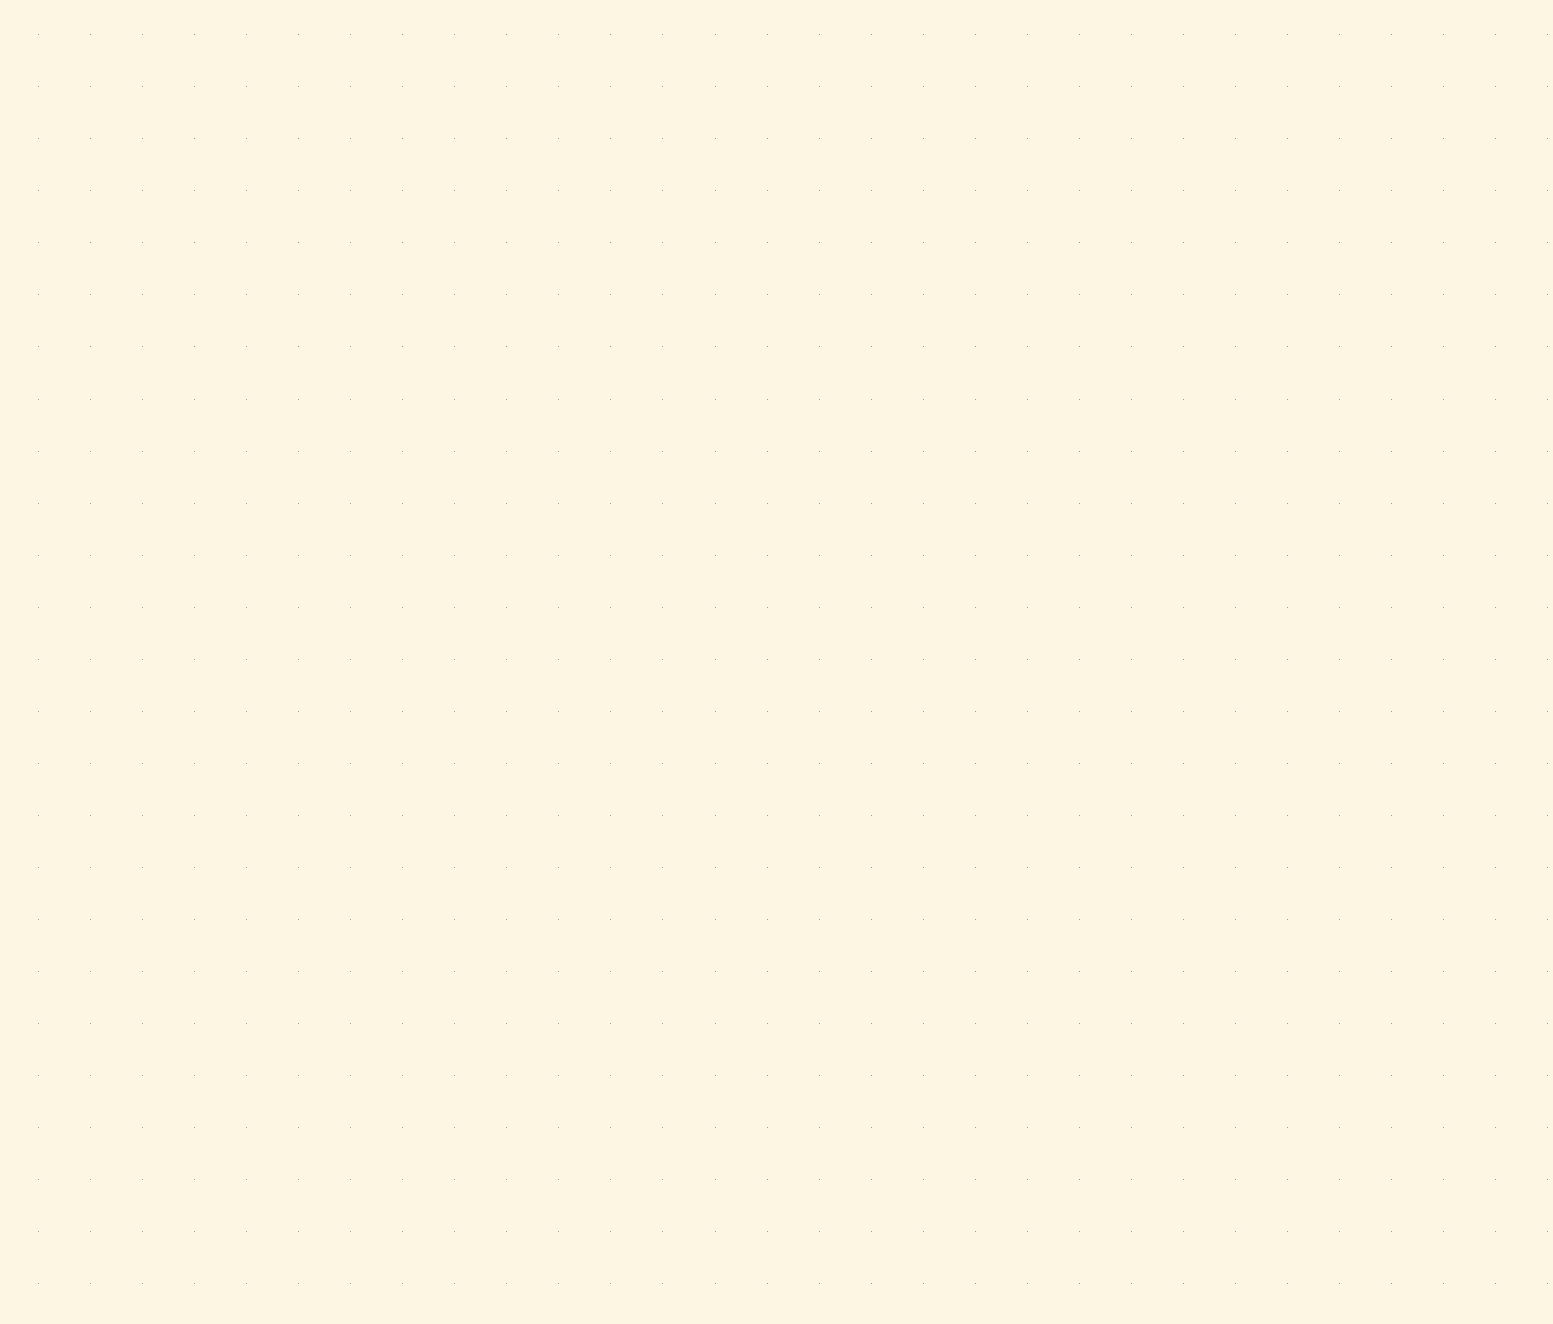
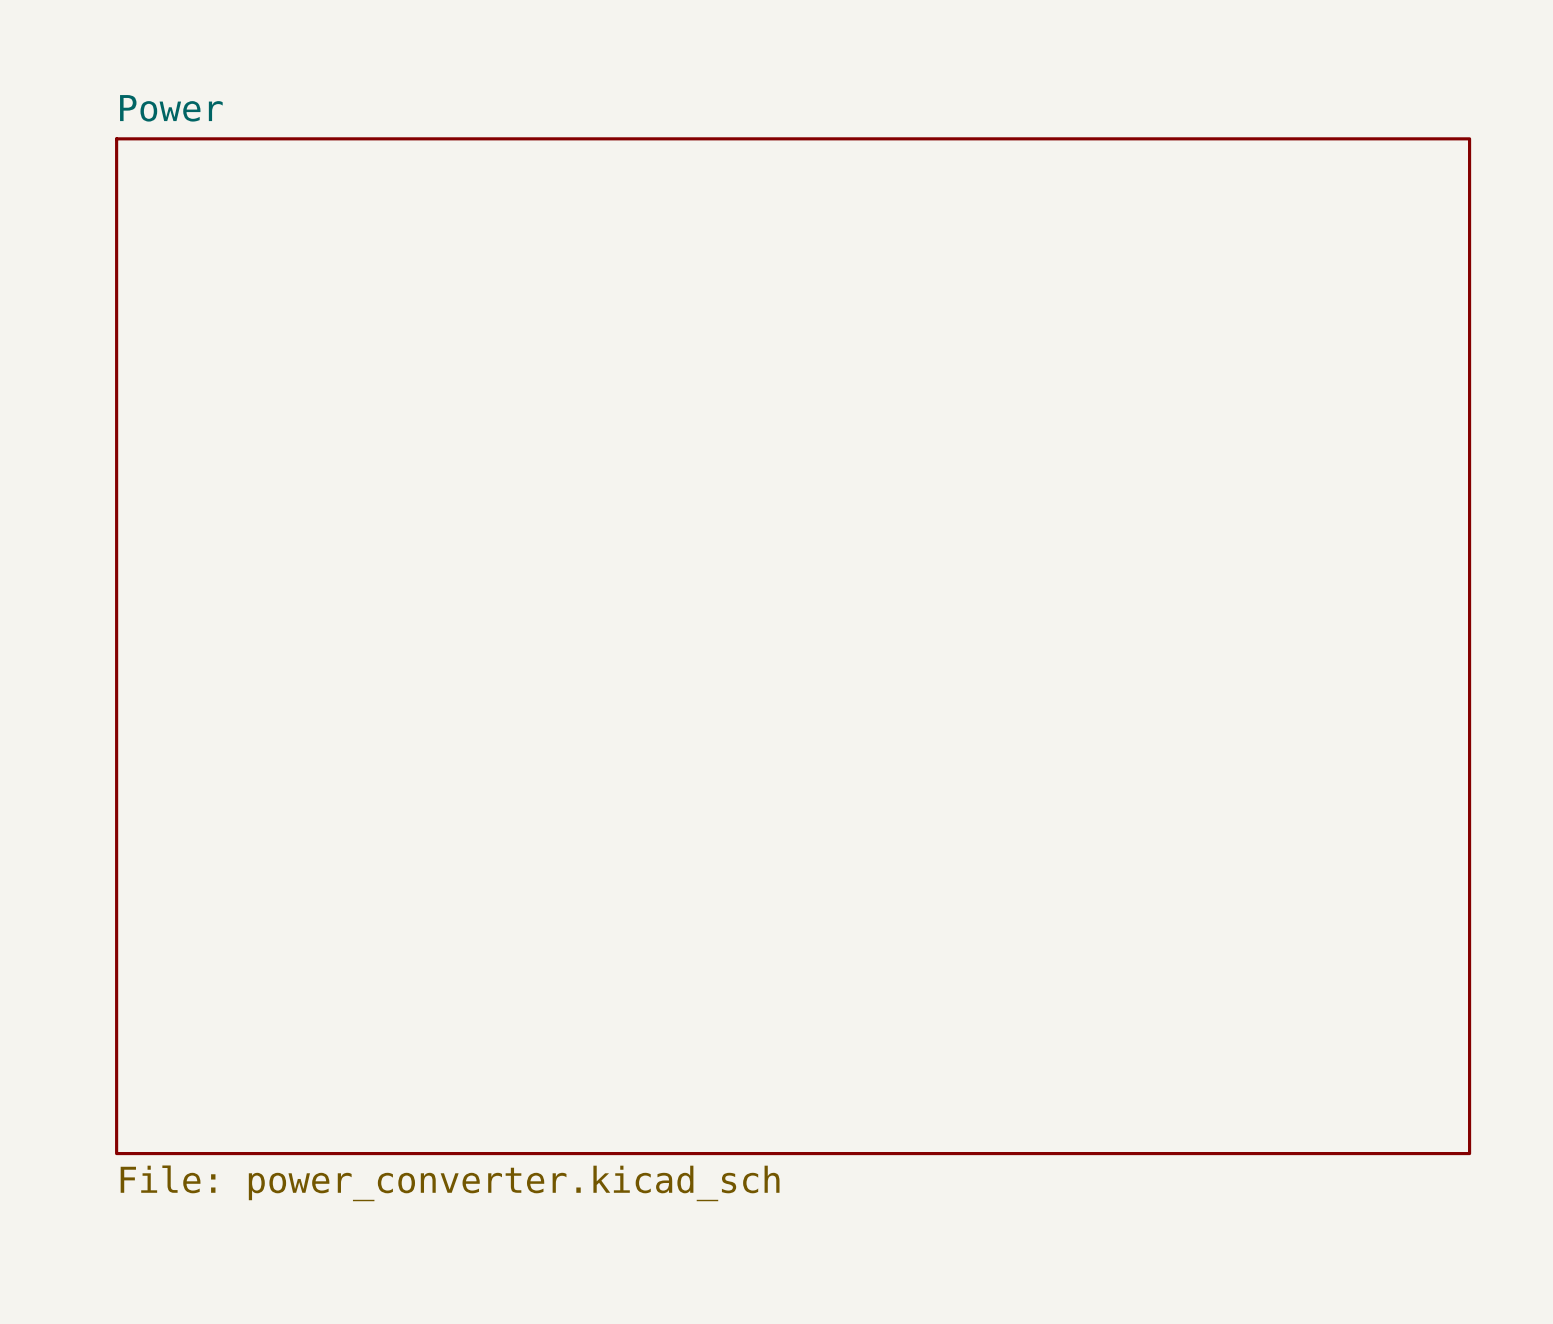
sheet Power: none -> File: power_converter.kicad_sch (793, 646)

